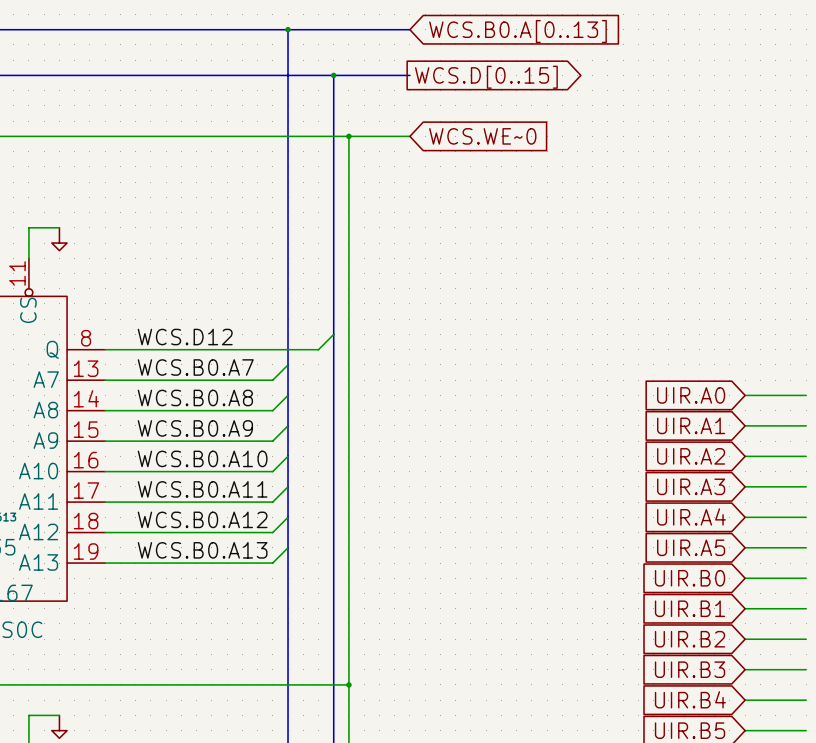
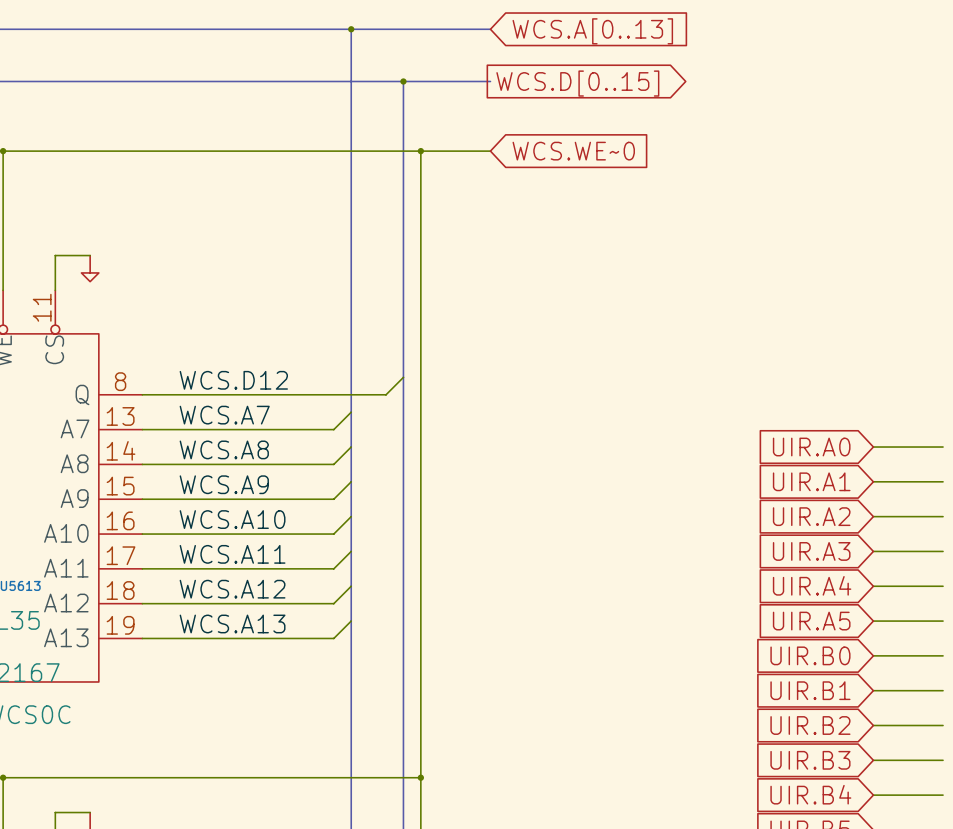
global label: WCS.B0.A[0..13] (517, 31) -> WCS.A[0..13] (592, 31)
label: WCS.B0.A7 (195, 367) -> WCS.A7 (224, 415)
label: WCS.B0.A8 (195, 397) -> WCS.A8 (224, 449)
label: WCS.B0.A9 (195, 428) -> WCS.A9 (224, 484)
label: WCS.B0.A10 (202, 458) -> WCS.A10 (232, 519)
label: WCS.B0.A11 (202, 489) -> WCS.A11 (232, 554)
label: WCS.B0.A12 (202, 519) -> WCS.A12 (232, 589)
label: WCS.B0.A13 (202, 550) -> WCS.A13 (232, 623)

